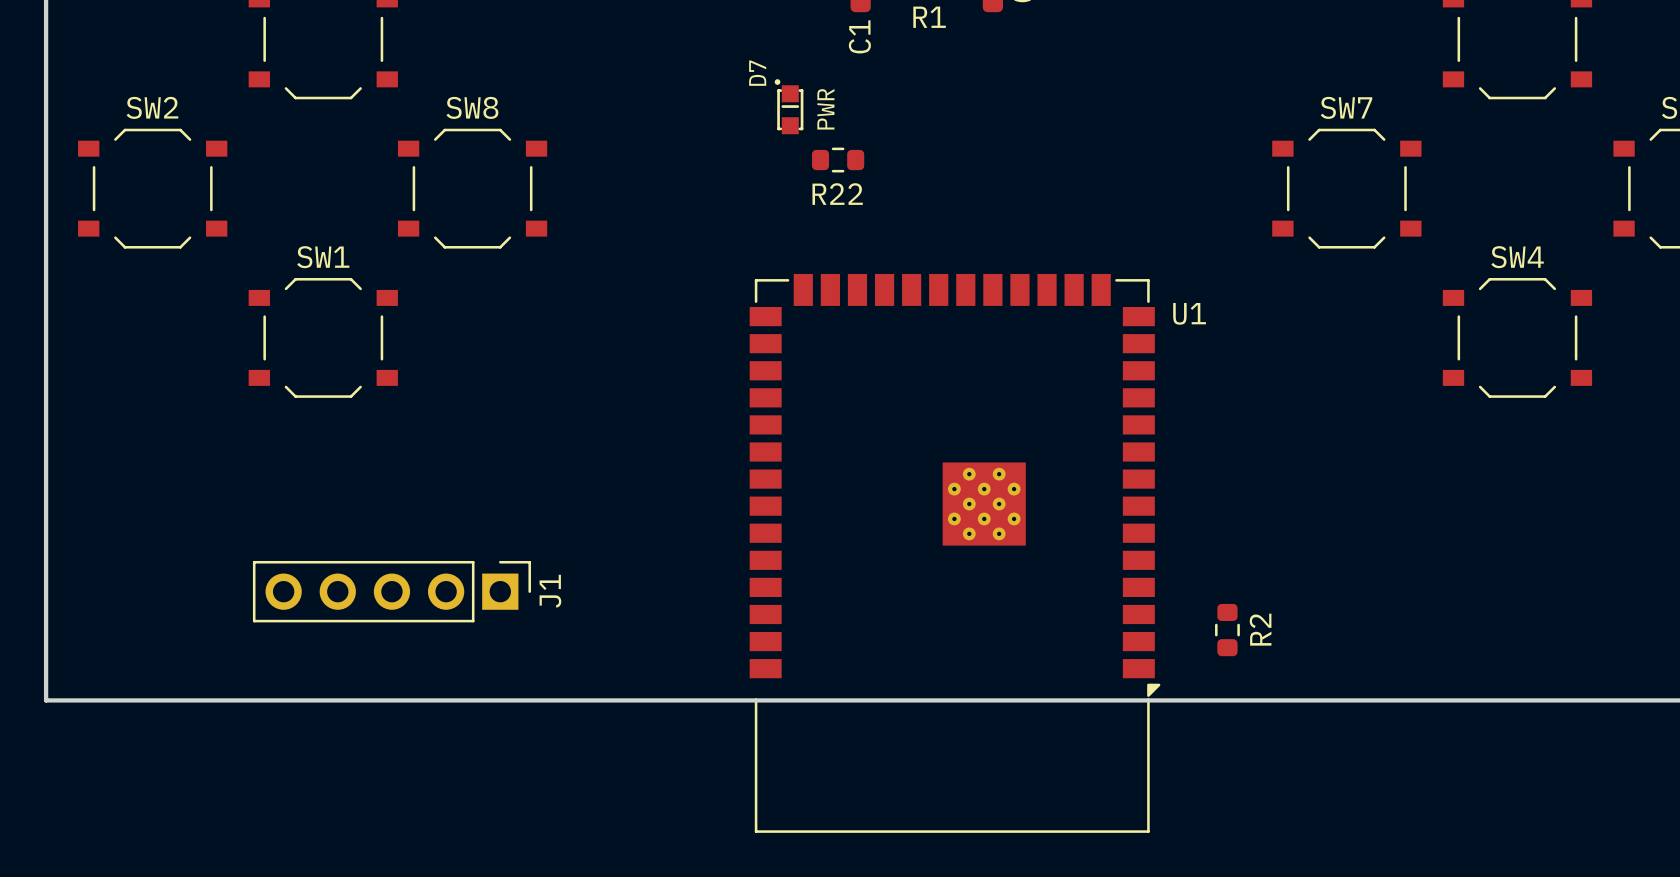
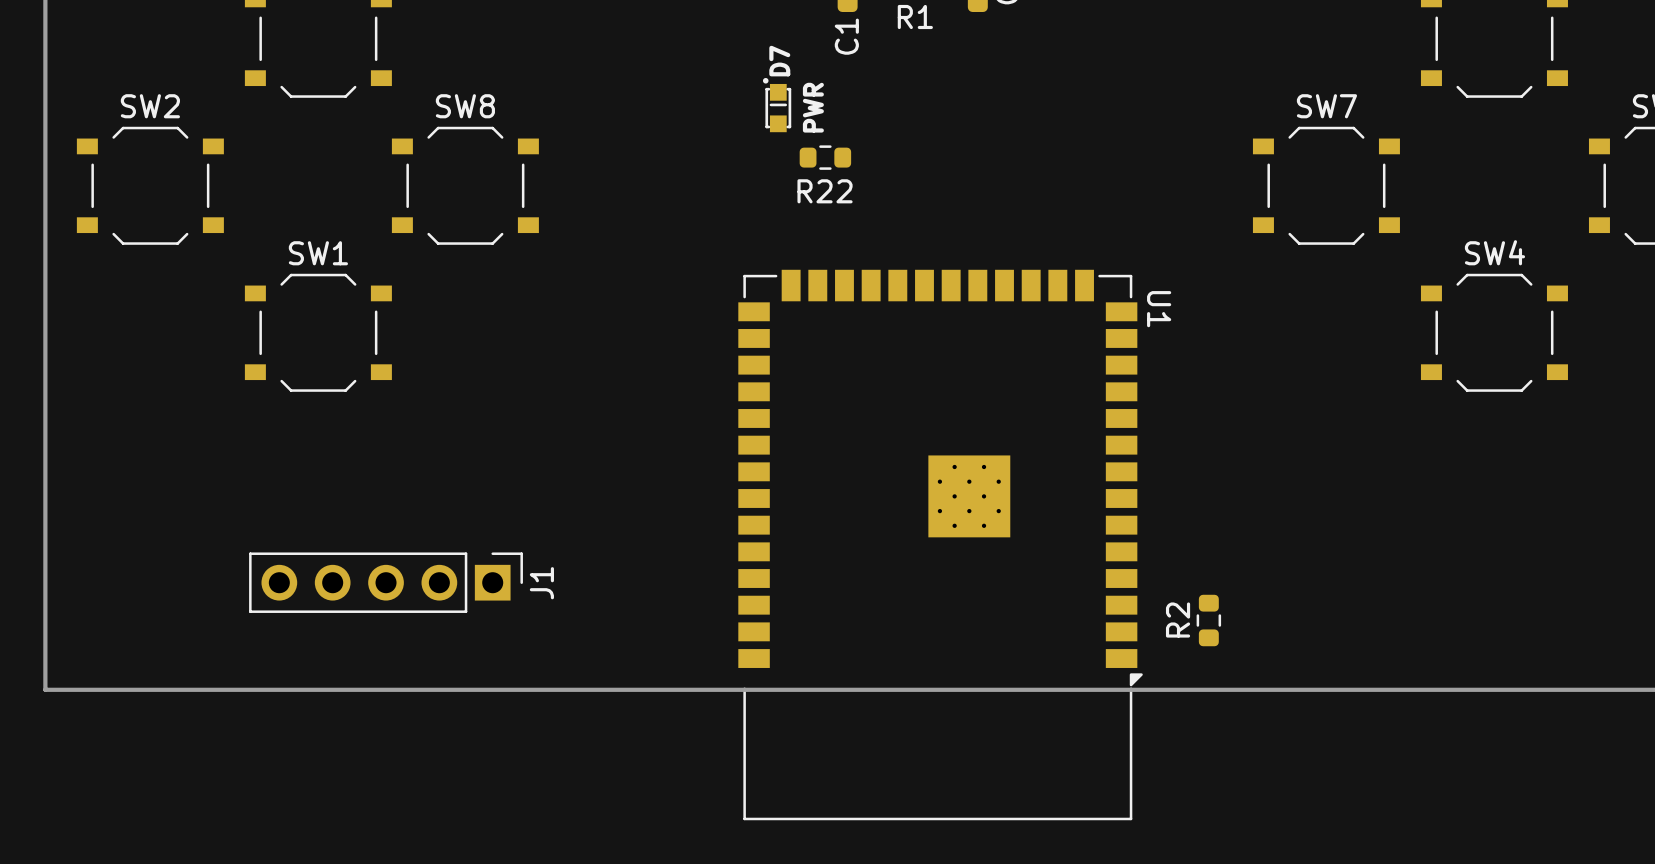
D7 name position: D7 (757, 73) -> D7 (779, 61)
U1 name rotation: 0° (1189, 313) -> 90° clockwise (1159, 309)
R2 name position: R2 (1260, 629) -> R2 (1178, 620)

